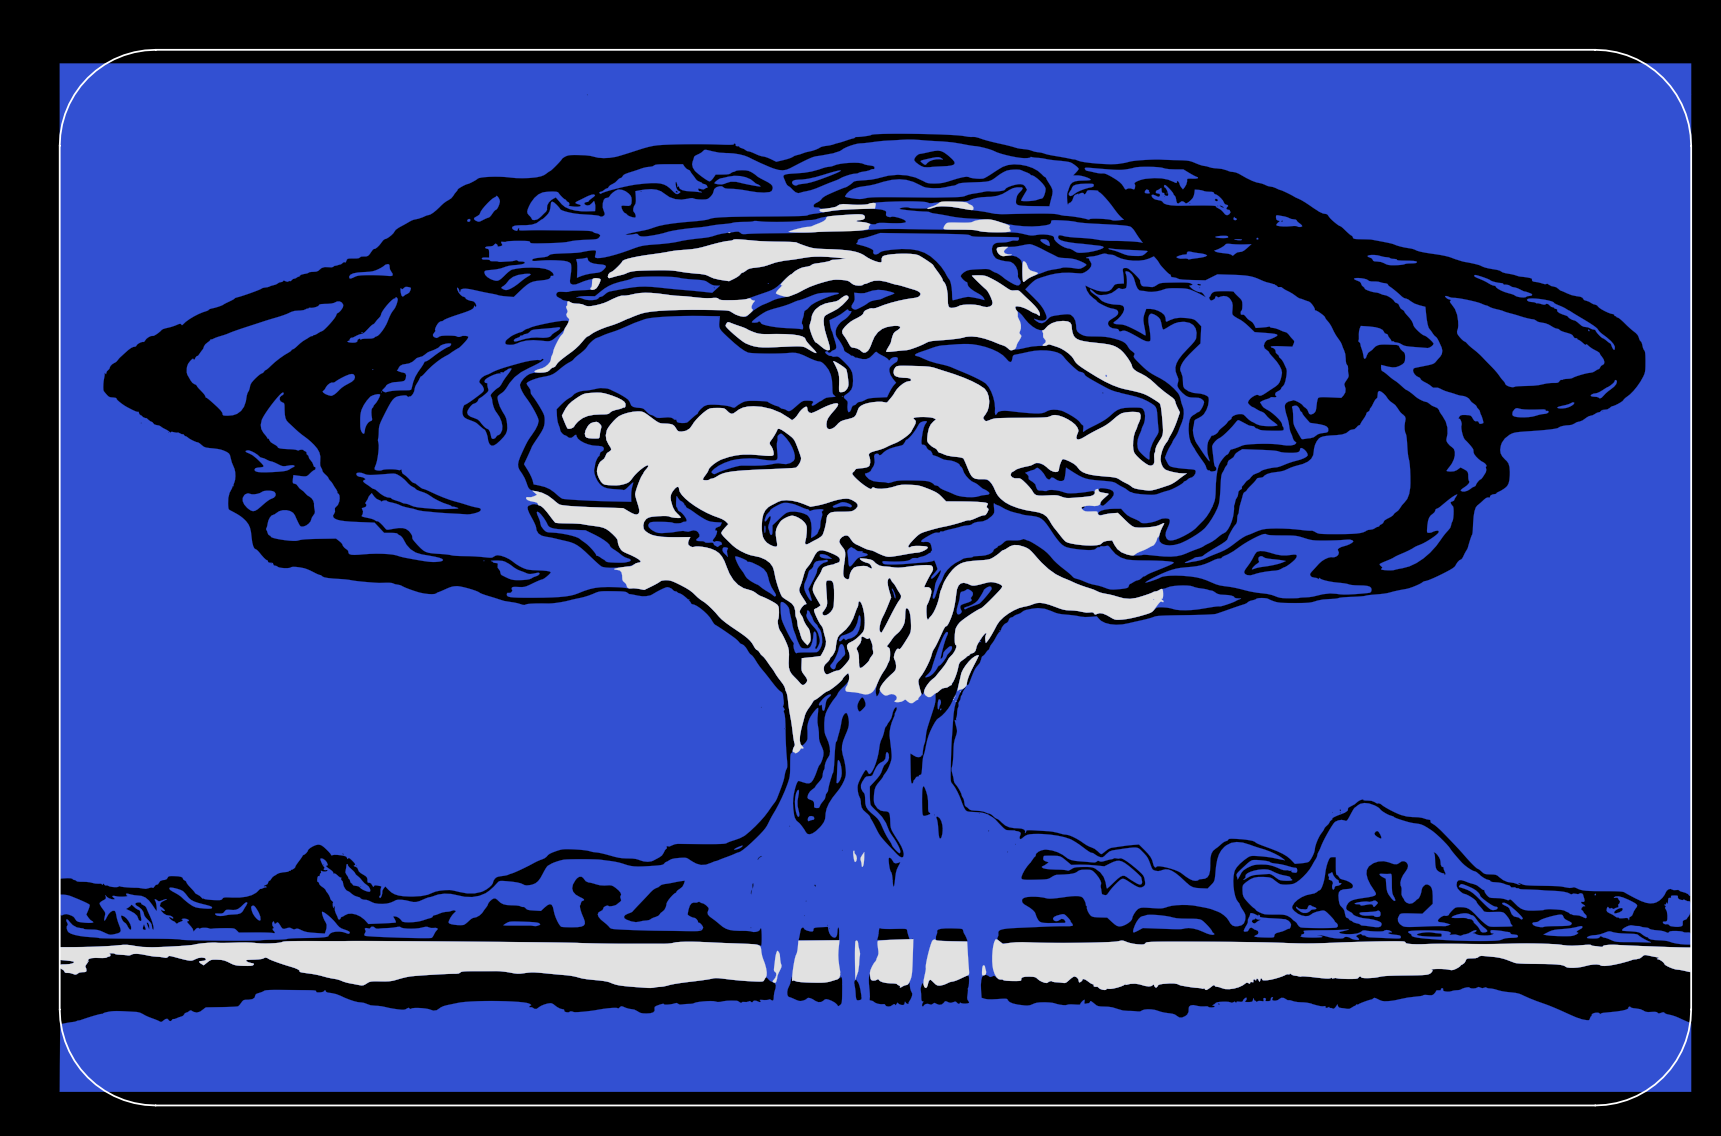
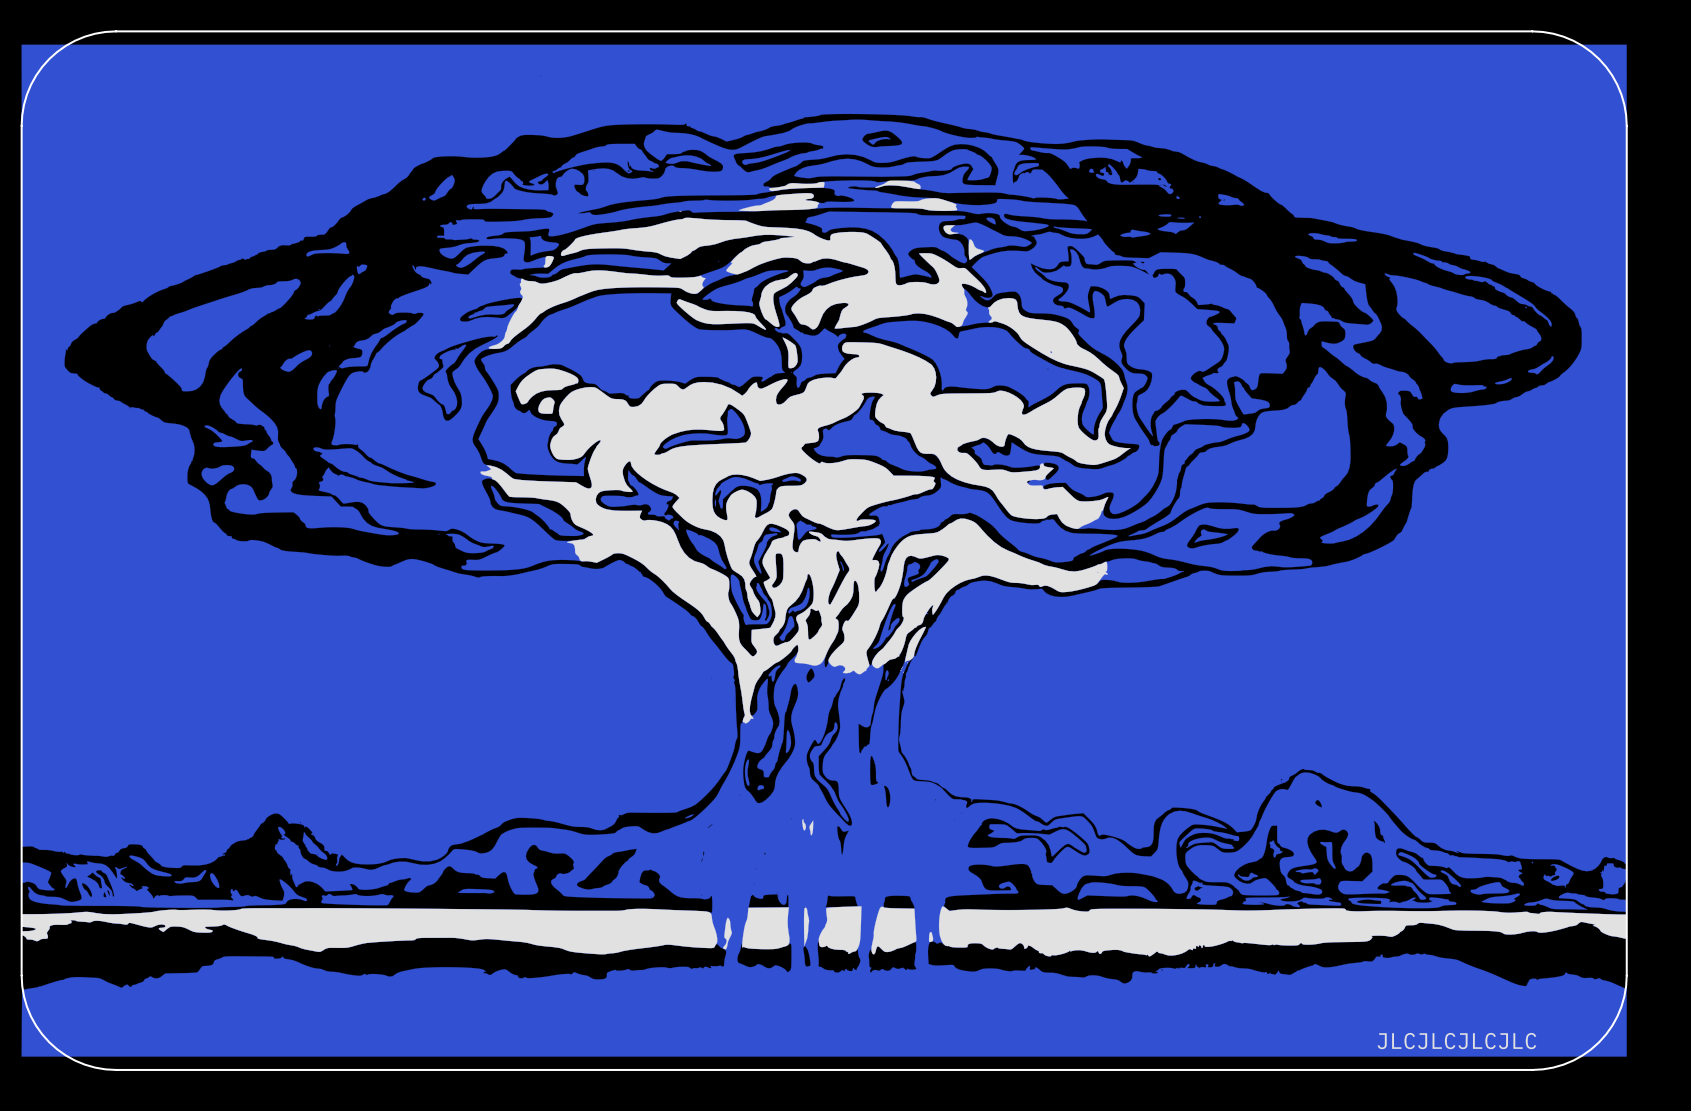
text: none -> JLCJLCJLCJLC (1456, 1041)

